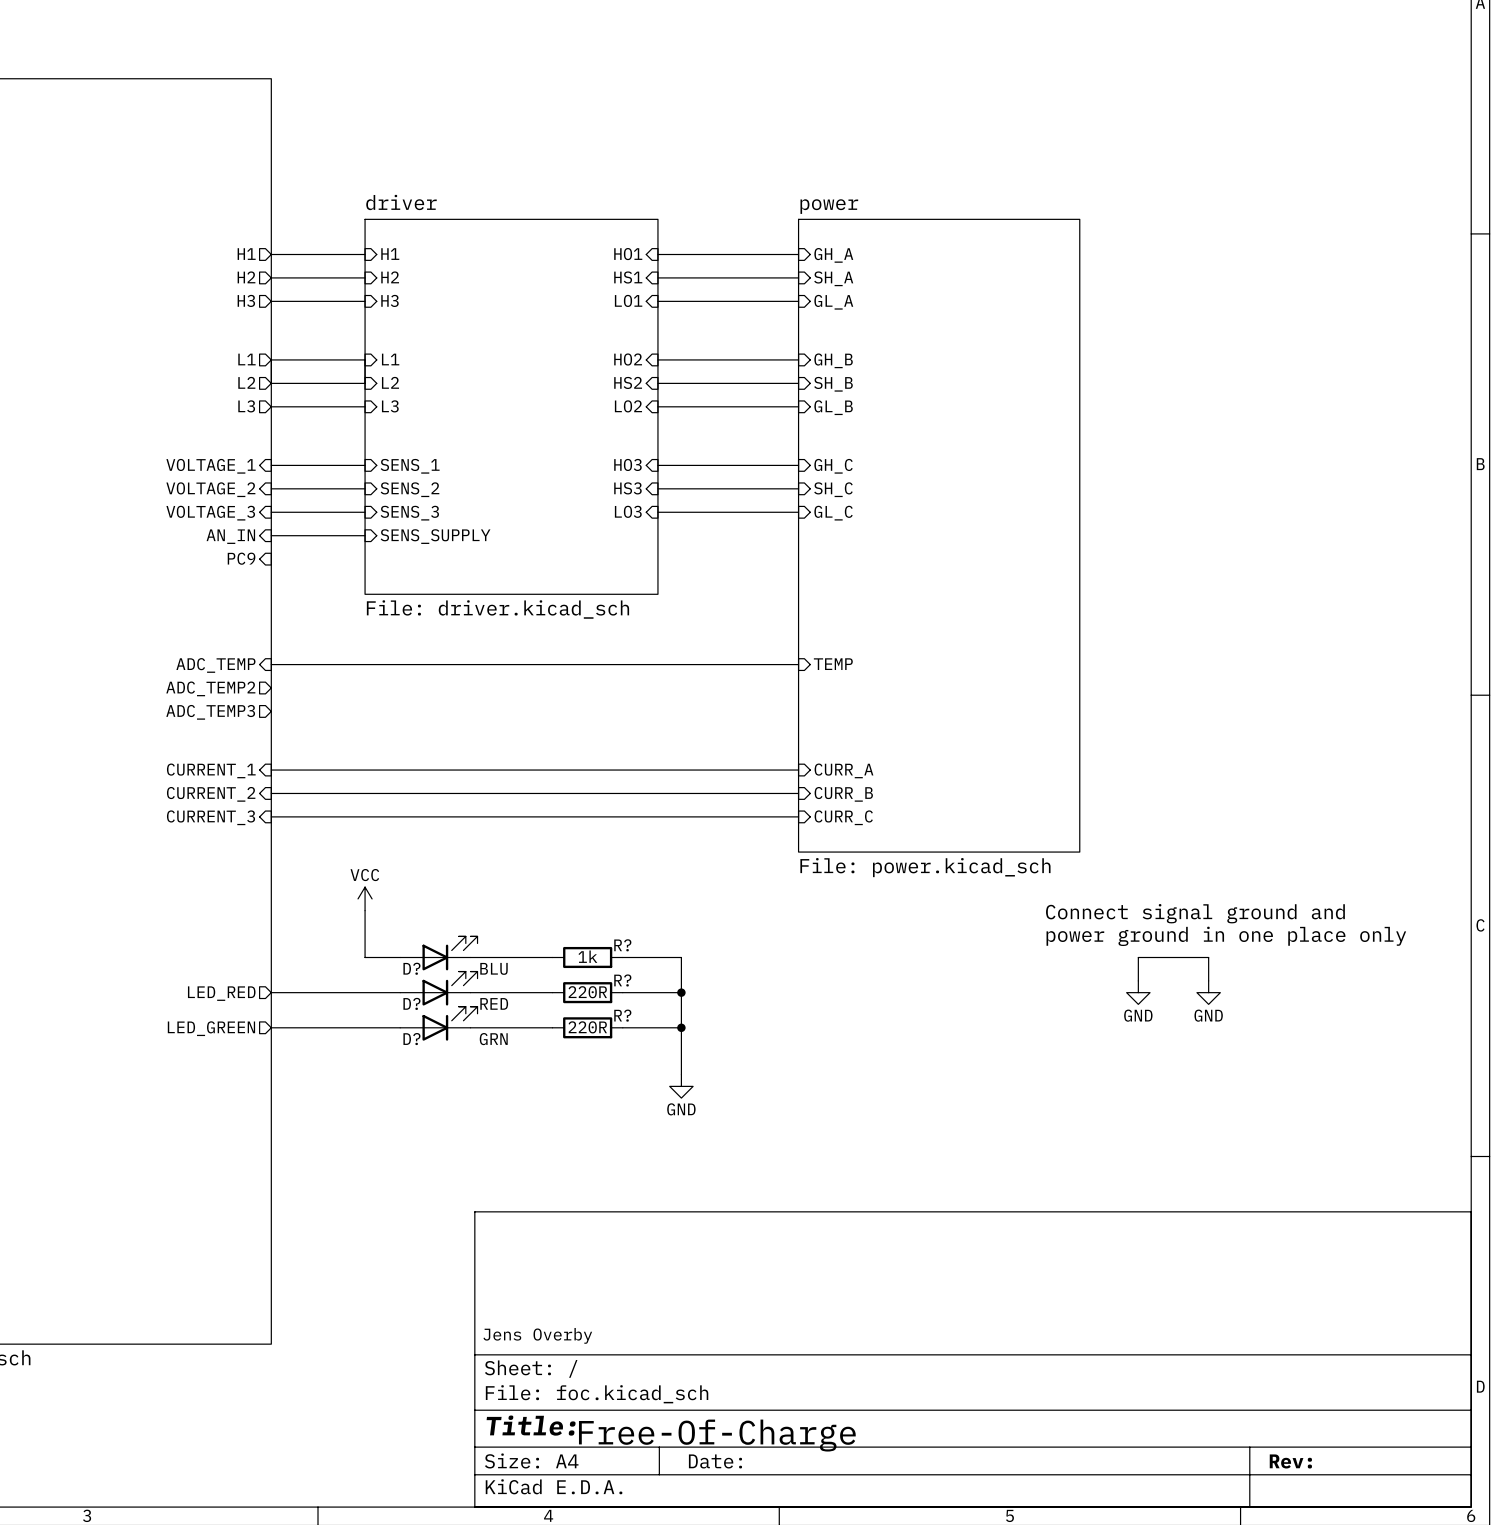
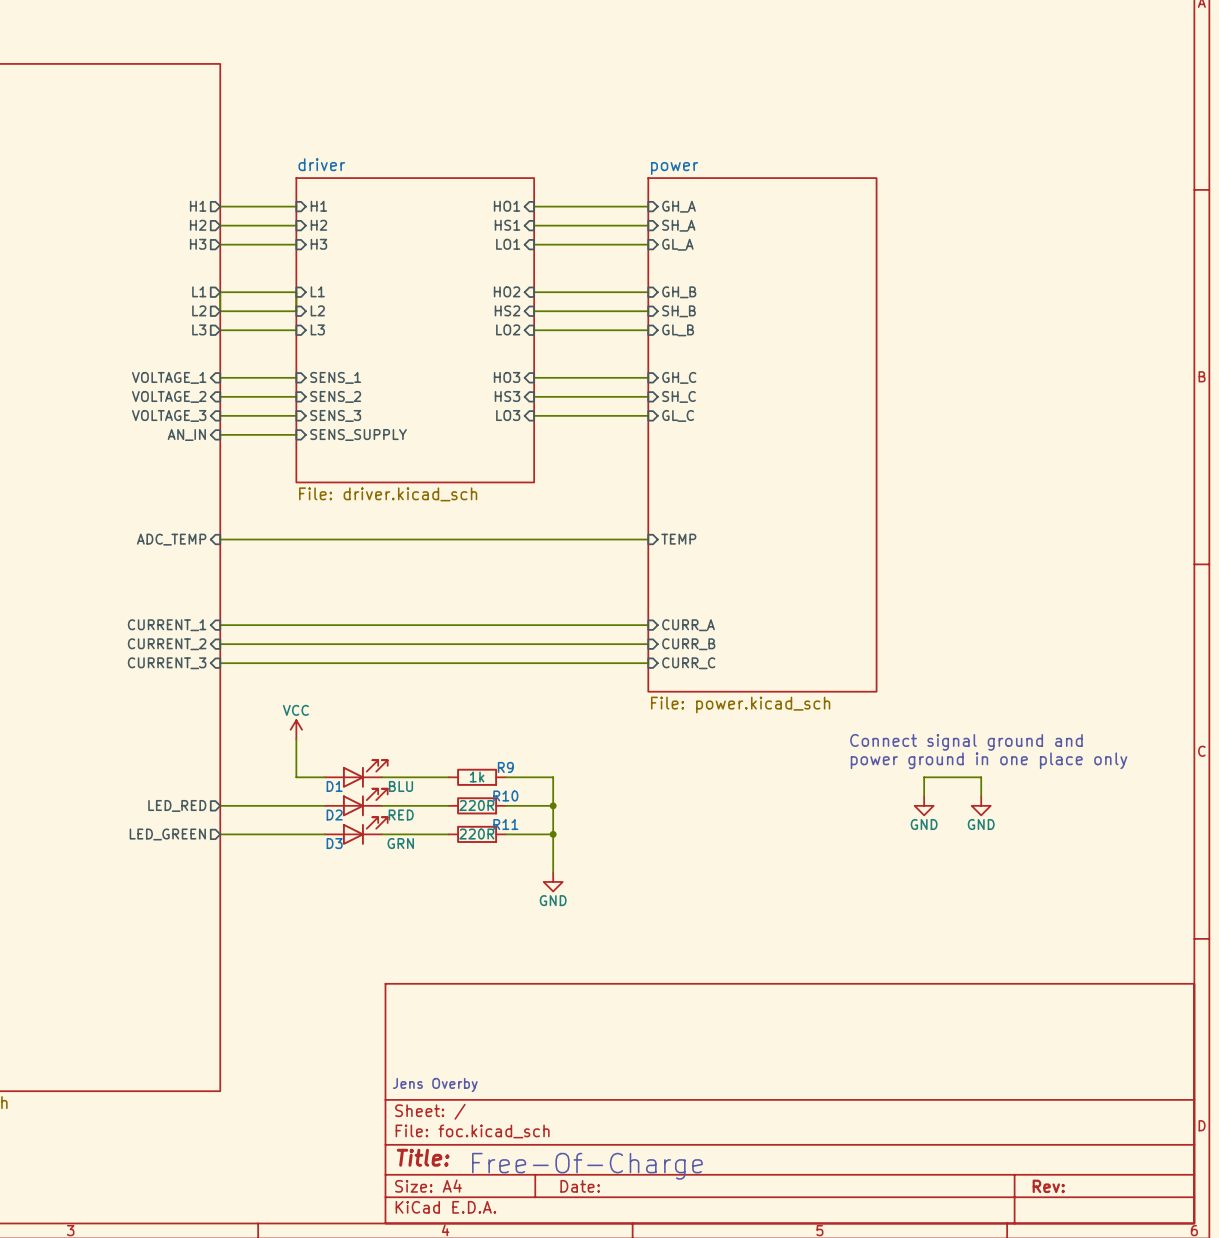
sheet pin: PC9 (241, 558) -> none
sheet pin: ADC_TEMP2 (210, 688) -> none
sheet pin: ADC_TEMP3 (210, 712) -> none
R? name: R? (622, 945) -> R9 (505, 767)
D? name: D? (411, 968) -> D1 (334, 786)
R? name: R? (622, 980) -> R10 (505, 795)
D? name: D? (411, 1003) -> D2 (334, 815)
R? name: R? (622, 1015) -> R11 (505, 824)
D? name: D? (411, 1039) -> D3 (334, 843)

